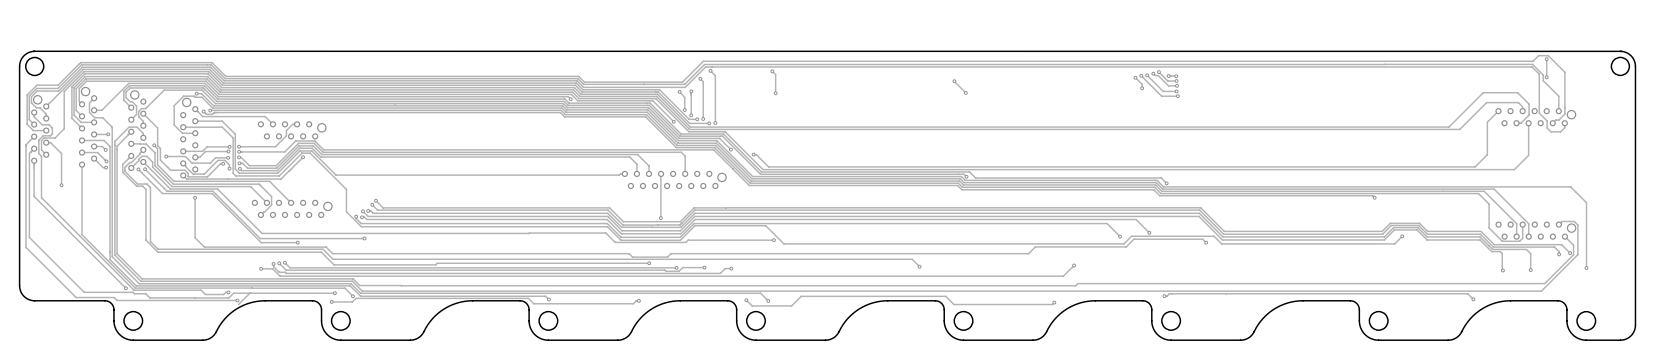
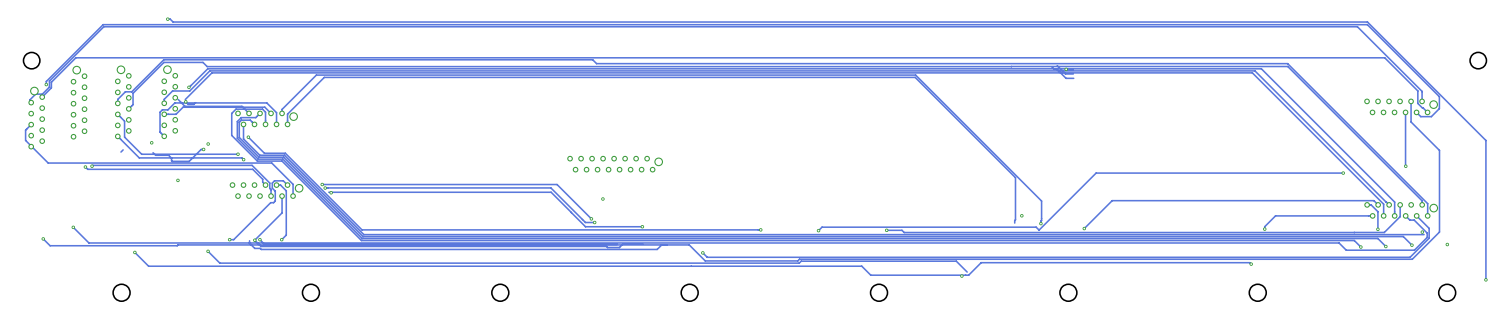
track: none -> (167, 19) (173, 22) (1367, 22) (1485, 140) (1485, 279)
via: none -> (167, 19)
board edge: (33, 51) (1621, 51) -> none
board edge: (1620, 51) (1631, 55) (1635, 66) (1635, 325) (1632, 334) (1624, 339) (1586, 340) (1575, 337) (1568, 327) (1566, 306) (1559, 300) (1506, 300) (1491, 304) (1475, 313) (1458, 335) (1449, 340) (1374, 339) (1366, 335) (1361, 329) (1359, 307) (1354, 301) (1303, 300) (1287, 302) (1274, 309) (1262, 318) (1251, 335) (1245, 339) (1171, 340) (1160, 337) (1154, 331) (1151, 323) (1151, 307) (1147, 301) (1095, 300) (1080, 302) (1066, 309) (1055, 318) (1043, 335) (1038, 339) (963, 340) (953, 337) (947, 331) (944, 323) (943, 307) (939, 301) (887, 300) (872, 302) (859, 309) (847, 318) (836, 335) (830, 339) (755, 340) (745, 337) (739, 331) (736, 323) (736, 307) (732, 301) (680, 300) (665, 302) (651, 309) (639, 318) (628, 335) (622, 339) (548, 340) (538, 337) (532, 331) (529, 323) (528, 306) (521, 300) (468, 300) (454, 304) (437, 313) (421, 335) (412, 340) (336, 339) (328, 335) (323, 329) (321, 307) (317, 301) (265, 300) (250, 302) (236, 309) (224, 318) (213, 335) (207, 339) (133, 340) (123, 337) (116, 331) (114, 323) (113, 307) (108, 301) (34, 300) (27, 298) (21, 293) (19, 285) (19, 66) (24, 55) (34, 51) -> none
track: (1546, 59) (1546, 77) -> none
via: (1546, 59) -> none
track: (81, 64) (211, 64) (224, 78) (577, 78) (583, 84) (684, 84) (704, 64) (1532, 64) (1543, 75) (1543, 80) (1558, 96) (1558, 100) -> (74, 59) (1384, 57) (1417, 90) (1417, 103) (1427, 112)
track: (711, 66) (1532, 66) (1539, 74) (1539, 113) (1547, 120) (1547, 128) (1550, 131) (1560, 131) (1564, 127) (1564, 123) -> none
track: (711, 67) (705, 67) (685, 87) (583, 87) (576, 80) (224, 80) (210, 67) (82, 67) (58, 91) (37, 91) (31, 96) (31, 102) (46, 114) (46, 118) -> none
track: (710, 70) (715, 75) (715, 123) -> none
via: (710, 70) -> none
track: (772, 71) (775, 74) (775, 93) -> none
via: (772, 71) -> none
via: (1158, 72) -> none
via: (1153, 73) -> none
track: (1141, 75) (1161, 96) (1177, 96) -> none
via: (1141, 75) -> none
track: (1147, 75) (1163, 91) (1176, 91) -> none
via: (1147, 75) -> none
via: (1176, 76) -> none
track: (1135, 77) (1142, 84) (1142, 88) -> none
via: (1135, 77) -> none
via: (1546, 77) -> none
track: (700, 78) (703, 81) (703, 119) -> none
via: (700, 78) -> none
track: (954, 81) (965, 92) -> none
via: (954, 81) -> none
via: (1176, 81) -> none
via: (1176, 85) -> none
track: (203, 87) (216, 101) (564, 101) (568, 105) (649, 105) (680, 136) (722, 136) (760, 174) (964, 174) (966, 176) -> none
track: (203, 87) (130, 87) (125, 92) (125, 97) (136, 106) (136, 114) (131, 119) -> none
track: (58, 88) (36, 88) (29, 95) (29, 119) (34, 124) -> (52, 80) (51, 87)
via: (1142, 88) -> none
via: (679, 91) -> none
via: (691, 91) -> none
via: (1176, 91) -> none
via: none -> (46, 84)
track: (679, 92) (684, 97) (684, 110) -> none
track: (691, 92) (691, 115) -> none
via: (965, 92) -> none
track: (196, 93) (201, 93) (213, 105) (562, 105) (566, 109) (647, 109) (678, 140) (716, 140) (752, 176) (961, 176) (965, 180) (1157, 180) (1163, 186) (1570, 186) (1586, 202) (1586, 268) -> none
via: (196, 93) -> none
via: (775, 93) -> none
via: none -> (188, 87)
track: (56, 96) (83, 69) (209, 69) (223, 83) (576, 83) (582, 89) (659, 89) (689, 119) (697, 119) -> none
via: (1177, 96) -> none
track: (94, 98) (89, 102) (89, 112) (94, 117) (102, 117) (112, 127) (112, 256) (139, 283) (351, 283) (360, 293) (760, 293) (768, 300) -> none
track: (570, 99) (568, 96) (218, 96) (205, 83) (128, 83) (101, 110) (94, 110) -> none
via: (570, 99) -> none
track: none -> (1422, 91) (1357, 26) (103, 26) (49, 81) (49, 87) (42, 94) (35, 94) (29, 99) (29, 103)
track: (82, 104) (79, 101) (79, 88) (86, 81) (206, 81) (219, 94) (571, 94) (577, 100) (652, 100) (673, 121) -> none
track: (131, 107) (123, 100) (123, 91) (129, 85) (204, 85) (217, 99) (564, 99) (569, 103) (650, 103) (681, 134) (723, 134) (761, 171) (969, 171) (975, 178) (1161, 178) (1166, 183) -> none
track: (210, 110) (561, 110) (565, 114) (646, 114) (677, 145) (715, 145) (751, 181) (959, 181) (963, 184) (1155, 184) (1161, 191) (1443, 191) -> none
via: (210, 110) -> none
via: (684, 110) -> none
track: (1498, 111) (1487, 122) (1487, 154) (1475, 166) (768, 166) (756, 154) (753, 154) -> none
track: (1522, 111) (1522, 106) (1518, 102) (1486, 102) (1459, 129) (689, 129) (656, 96) (580, 96) (573, 89) (220, 89) (207, 76) (85, 76) (74, 87) (74, 115) (81, 122) (94, 122) -> none
track: (34, 112) (34, 116) (42, 124) (48, 124) (52, 128) (50, 135) (43, 135) (38, 140) (38, 153) (41, 156) (41, 197) (134, 290) (201, 290) (205, 294) (223, 294) (228, 292) -> none
part: none -> (169, 102)
track: (214, 112) (560, 112) (564, 116) (645, 116) (676, 147) (714, 147) (750, 183) (958, 183) (962, 187) (1154, 187) (1160, 193) (1478, 193) (1489, 204) (1489, 228) (1502, 241) (1519, 241) (1522, 238) (1522, 224) -> (164, 103) (164, 99) (172, 90) (189, 90) (209, 70) (1254, 70) (1389, 204)
track: (143, 113) (157, 127) (157, 145) (160, 148) (160, 160) (167, 167) -> none
via: (691, 115) -> none
track: (82, 116) (76, 110) (76, 88) (85, 78) (206, 78) (220, 92) (572, 92) (579, 98) (655, 98) (688, 131) (725, 131) (762, 169) (1514, 169) (1528, 155) (1528, 123) -> none
track: none -> (128, 108) (133, 104) (133, 93) (163, 62) (202, 62) (207, 66) (1287, 66) (1422, 200) (1422, 204)
via: (697, 119) -> none
via: (703, 119) -> none
track: (195, 121) (222, 121) (235, 134) (235, 169) (239, 173) (277, 173) (299, 150) (311, 150) (336, 175) (624, 173) -> none
via: (673, 121) -> none
track: (709, 123) (689, 123) (658, 91) (582, 91) (575, 85) (222, 85) (208, 71) (84, 71) (64, 91) (64, 128) (55, 138) (44, 138) (41, 140) (41, 149) (46, 154) -> none
via: (709, 123) -> none
via: (715, 123) -> none
track: (1516, 123) (1520, 123) (1529, 115) (1529, 104) (1517, 92) (1483, 92) (1448, 127) (690, 127) (657, 94) (581, 94) (574, 87) (221, 87) (207, 73) (84, 73) (71, 86) (71, 118) (82, 128) -> none
track: none -> (1405, 112) (1405, 166)
track: (1552, 123) (1564, 114) (1564, 72) (1548, 55) (1538, 55) (1533, 61) (703, 61) (682, 82) (584, 82) (578, 76) (225, 76) (212, 62) (80, 62) (58, 85) (36, 85) (27, 95) (27, 124) (33, 130) (46, 130) -> (1416, 112) (1420, 116) (1431, 116) (1439, 108) (1439, 96) (1367, 24) (103, 24) (46, 81) (46, 84)
track: none -> (260, 113) (255, 117) (241, 117) (237, 121) (237, 138) (258, 159) (282, 159) (362, 238) (1377, 238) (1385, 246)
track: (297, 124) (292, 124) (286, 130) (286, 135) (275, 146) (238, 146) -> (271, 113) (264, 107) (183, 107) (176, 114) (164, 114)
track: none -> (282, 113) (282, 109) (316, 75) (915, 75) (1041, 201) (1040, 223)
track: none -> (117, 114) (124, 121) (124, 137) (141, 154) (238, 154)
track: (143, 125) (143, 121) (138, 116) (138, 111) (141, 108) (145, 108) (164, 90) (202, 90) (215, 103) (563, 103) (567, 107) (648, 107) (679, 138) (719, 138) (730, 149) -> none
part position: (88, 127) -> (79, 102)
track: (183, 127) (222, 127) (233, 138) (233, 173) (235, 175) (279, 175) (301, 153) -> none
part position: (137, 130) -> (123, 102)
track: (131, 131) (117, 146) (117, 253) (142, 278) (353, 278) (359, 285) (401, 285) (1544, 283) (1573, 254) (1573, 245) (1564, 236) -> (117, 103) (117, 99) (125, 91) (131, 91) (163, 59) (592, 59) (596, 63) (1287, 63) (1427, 203) (1427, 215)
track: (195, 133) (182, 133) (174, 125) (174, 105) (183, 96) (201, 97) (212, 108) (561, 108) (566, 112) (647, 112) (678, 143) (716, 143) (751, 178) (960, 178) (964, 182) (1156, 182) (1162, 189) (1494, 189) (1528, 223) -> (188, 87) (207, 68) (1261, 68) (1394, 204)
track: (108, 134) (94, 134) -> none
via: (108, 134) -> none
track: (34, 136) (25, 144) (25, 247) (76, 297) (114, 297) (117, 300) (237, 300) -> none
track: none -> (243, 124) (243, 138) (259, 155) (284, 155) (363, 234) (1424, 234)
track: none -> (254, 124) (250, 120) (241, 120) (239, 122) (239, 137) (259, 157) (283, 157) (363, 236) (1403, 236) (1411, 245)
track: none -> (265, 124) (265, 112) (262, 109) (235, 109) (231, 113) (231, 135) (257, 161) (282, 161) (361, 240) (1354, 240) (1360, 247)
track: none -> (276, 124) (276, 112) (266, 102) (174, 102) (167, 109) (162, 109) (160, 112) (160, 132) (164, 136)
track: none -> (287, 124) (287, 114) (324, 77) (915, 77) (1015, 177) (1014, 223)
track: (143, 137) (143, 133) (137, 127) (129, 127) (114, 141) (114, 255) (140, 281) (352, 281) (362, 291) (1541, 291) (1577, 254) -> (43, 238) (50, 245) (689, 244) (705, 260) (1412, 259) (1439, 232)
track: none -> (29, 125) (25, 130) (25, 140) (48, 163) (271, 163) (293, 184) (293, 196)
part: (189, 138) -> none
track: (82, 140) (104, 140) (109, 146) (110, 259) (136, 285) (350, 285) (360, 296) (545, 296) (548, 299) -> none
track: (46, 142) (50, 142) (61, 153) (61, 185) -> none
track: (131, 143) (146, 144) (154, 152) (154, 165) (173, 184) (259, 184) (271, 196) (271, 205) (260, 214) -> none
track: (154, 145) (157, 148) (157, 164) (174, 181) (269, 181) (287, 199) -> (85, 167) (87, 169) (252, 169) (262, 179) (262, 182)
via: (154, 145) -> none
track: (94, 146) (102, 146) (105, 149) -> none
track: (229, 146) (207, 146) (202, 151) (183, 151) -> none
via: (229, 146) -> none
via: (238, 146) -> none
track: (34, 148) (29, 153) (29, 237) (84, 292) (133, 292) (145, 293) (149, 297) (195, 297) -> none
track: (316, 148) (321, 154) (637, 154) (648, 165) (648, 173) -> none
track: (316, 148) (313, 145) (299, 145) (276, 168) (247, 168) (242, 163) (239, 163) -> none
via: (105, 149) -> none
track: none -> (117, 136) (139, 157) (241, 157) (243, 159)
track: (143, 149) (124, 167) (124, 171) (137, 184) (146, 184) (150, 187) (150, 241) (158, 249) (323, 249) (333, 259) (912, 259) (919, 266) -> none
via: (730, 149) -> none
track: none -> (248, 137) (264, 153) (285, 153) (361, 229) (760, 229)
via: none -> (248, 137)
track: (228, 151) (205, 151) (199, 157) (195, 157) -> none
via: (228, 151) -> none
track: (239, 151) (284, 151) (295, 141) (314, 141) (323, 149) (713, 149) (749, 185) (957, 185) (961, 189) (1153, 189) (1159, 195) (1372, 195) (1374, 197) -> none
via: (239, 151) -> none
track: (82, 152) (97, 152) (106, 161) -> none
track: (301, 153) (310, 153) (346, 189) (346, 211) (361, 226) (607, 226) (621, 240) (680, 240) (694, 225) (765, 225) (783, 243) (1123, 243) (1131, 236) (1214, 236) (1221, 243) (1394, 243) (1402, 236) -> none
via: (753, 154) -> none
track: (131, 155) (122, 164) (122, 172) (136, 186) (142, 186) (146, 189) (146, 240) (158, 252) (321, 252) (334, 264) (649, 263) -> none
track: (166, 156) (185, 156) (192, 163) (210, 163) (215, 157) (228, 157) -> none
track: (238, 157) (249, 165) (276, 165) (298, 143) (314, 143) (323, 152) (681, 152) (685, 156) (685, 173) -> none
via: (238, 157) -> none
track: (303, 157) (281, 179) (186, 179) (183, 175) -> none
via: (303, 157) -> none
track: (94, 158) (103, 167) (106, 167) -> none
track: (34, 160) (34, 196) (125, 288) -> none
via: (106, 161) -> none
track: (143, 161) (170, 188) (217, 188) (231, 202) -> none
track: (183, 163) (193, 174) (204, 174) (217, 160) (224, 160) (229, 165) (229, 168) -> none
via: (239, 163) -> none
track: (82, 164) (82, 234) (135, 288) (344, 288) (352, 296) -> none
track: (135, 164) (141, 156) (146, 156) (152, 162) (152, 167) (172, 186) (250, 186) (266, 202) -> none
via: (106, 167) -> none
via: (229, 168) -> none
track: (239, 168) (241, 170) (277, 170) (299, 148) (312, 148) (320, 157) (629, 157) (636, 164) (636, 173) -> none
via: (239, 168) -> none
track: (138, 169) (162, 193) (212, 193) (261, 242) (297, 242) -> none
via: (138, 169) -> none
track: (145, 169) (167, 191) (212, 191) (215, 194) -> none
via: (145, 169) -> none
via: none -> (238, 154)
track: (661, 173) (660, 218) -> none
via: none -> (243, 159)
via: (966, 176) -> none
track: none -> (92, 166) (252, 165) (269, 183) (271, 196)
via: none -> (92, 166)
via: none -> (1405, 166)
via: none -> (85, 167)
via: (1166, 183) -> none
via: (61, 185) -> none
track: none -> (1343, 173) (1096, 173) (1039, 230) (1036, 227) (822, 227) (818, 230)
via: none -> (1343, 173)
track: (1484, 191) (1443, 191) -> (1354, 174) (1252, 72) (211, 72) (185, 99)
track: (215, 194) (260, 238) (364, 238) -> none
track: (195, 197) (195, 237) (204, 247) (326, 247) (332, 253) (629, 253) (632, 257) (667, 257) (670, 253) (1028, 253) (1035, 246) (1126, 246) (1133, 239) (1202, 239) (1206, 242) -> none
via: (1374, 197) -> none
track: (375, 200) (383, 207) (609, 207) (623, 221) (680, 221) (694, 207) (725, 207) -> none
via: (375, 200) -> none
track: (231, 202) (262, 233) (605, 233) (615, 242) (773, 240) -> none
track: none -> (276, 185) (280, 185) (286, 190) (286, 235) (281, 239)
track: none -> (287, 185) (283, 180) (274, 180) (272, 188) (275, 191) (275, 201) (270, 202) (233, 239) (229, 239)
track: none -> (322, 184) (557, 184) (591, 218)
via: none -> (322, 184)
track: (372, 204) (377, 210) (608, 210) (622, 225) (680, 224) (694, 210) (1199, 210) (1223, 234) (1382, 234) (1391, 225) (1418, 225) (1427, 234) (1480, 234) (1493, 247) (1554, 247) (1559, 254) -> none
via: (372, 204) -> none
track: none -> (325, 188) (550, 187) (585, 222) (594, 222)
via: none -> (325, 188)
track: (725, 207) (1200, 207) (1224, 231) (1382, 231) (1390, 223) (1419, 223) (1427, 231) (1481, 231) (1494, 244) (1561, 244) (1570, 253) -> none
track: none -> (328, 192) (551, 192) (585, 226) (642, 226)
track: (362, 211) (368, 216) (607, 216) (622, 230) (680, 230) (694, 216) (1198, 216) (1222, 239) (1384, 239) (1394, 229) (1417, 229) (1427, 239) (1480, 239) (1491, 251) (1500, 251) (1502, 253) (1502, 270) -> none
track: (368, 211) (373, 213) (607, 213) (621, 227) (652, 227) (680, 227) (694, 213) (1199, 213) (1222, 236) (1384, 236) (1393, 227) (1417, 227) (1427, 236) (1479, 236) (1488, 245) -> none
via: (368, 211) -> none
track: none -> (282, 196) (282, 212) (255, 239)
track: (356, 216) (361, 223) (607, 223) (621, 237) (680, 237) (694, 223) (1107, 223) (1120, 236) -> none
via: (356, 216) -> none
track: (361, 217) (366, 219) (607, 219) (621, 233) (680, 233) (695, 219) (1136, 219) (1149, 232) -> none
via: (361, 217) -> none
track: none -> (1367, 204) (1371, 204) (1377, 211) (1377, 229)
track: none -> (1378, 204) (1373, 200) (1112, 200) (1084, 228)
track: none -> (1400, 204) (1400, 216) (1384, 232) (1354, 232)
track: (1558, 224) (1562, 221) (1574, 221) (1577, 225) -> (1411, 101) (1411, 121) (1439, 150) (1439, 205)
via position: (1149, 232) -> (1040, 223)
via position: (1402, 236) -> (1264, 229)
track: none -> (1372, 215) (1275, 215) (1264, 226) (1264, 229)
track: none -> (1405, 215) (1409, 220) (1414, 220) (1427, 233) (1427, 237) (1414, 250) (1346, 250) (1339, 242) (88, 242) (73, 227)
track: none -> (1416, 215) (1429, 228) (1429, 238) (1410, 257) (707, 257) (702, 252)
via: (364, 238) -> none
via: none -> (591, 218)
via: (773, 240) -> none
via: (297, 242) -> none
via position: (1206, 242) -> (1084, 228)
via: none -> (594, 222)
track: (1488, 245) (1492, 249) (1526, 249) (1530, 253) (1530, 269) -> none
via: none -> (642, 226)
via: none -> (73, 227)
via: none -> (760, 229)
via: none -> (1377, 229)
track: none -> (886, 230) (901, 230) (904, 232) (1354, 232)
via: none -> (886, 230)
via: (1570, 253) -> none
via: none -> (43, 238)
via: none -> (229, 239)
via: none -> (281, 239)
via: (273, 263) -> none
via: (649, 263) -> none
track: (1074, 265) (1063, 276) (280, 276) (272, 268) (261, 268) -> none
via: (1074, 265) -> none
via position: (919, 266) -> (818, 230)
via: (676, 267) -> none
via: (704, 267) -> none
via: (261, 268) -> none
via: (731, 268) -> none
via: none -> (1411, 245)
via: none -> (1360, 247)
via: (1502, 270) -> none
via: none -> (1385, 246)
via: (1530, 270) -> none
track: none -> (208, 251) (219, 263) (799, 263) (801, 261) (956, 261) (967, 272)
via: none -> (208, 251)
track: none -> (134, 252) (148, 266) (861, 266) (870, 275) (968, 275) (981, 262) (1251, 264)
via: none -> (702, 252)
via position: (125, 288) -> (134, 252)
via: none -> (1251, 264)
via: (228, 292) -> none
track: (249, 293) (238, 304) -> none
track: (334, 293) (233, 293) (228, 297) (195, 297) -> none
via: (334, 293) -> none
via: (352, 296) -> none
track: (1164, 296) (1169, 293) (1467, 293) (1473, 299) -> none
via: (1164, 296) -> none
via: (548, 299) -> none
via: (1473, 299) -> none
via: (237, 300) -> none
track: (638, 300) (633, 303) (533, 303) (528, 298) (355, 298) (352, 301) (331, 301) -> none
via: (638, 300) -> none
track: (746, 300) (752, 305) (791, 305) (801, 296) (945, 296) (953, 304) (1052, 304) (1054, 302) -> none
via: (746, 300) -> none
via: (768, 300) -> none
via: (331, 301) -> none
via: none -> (1485, 279)

